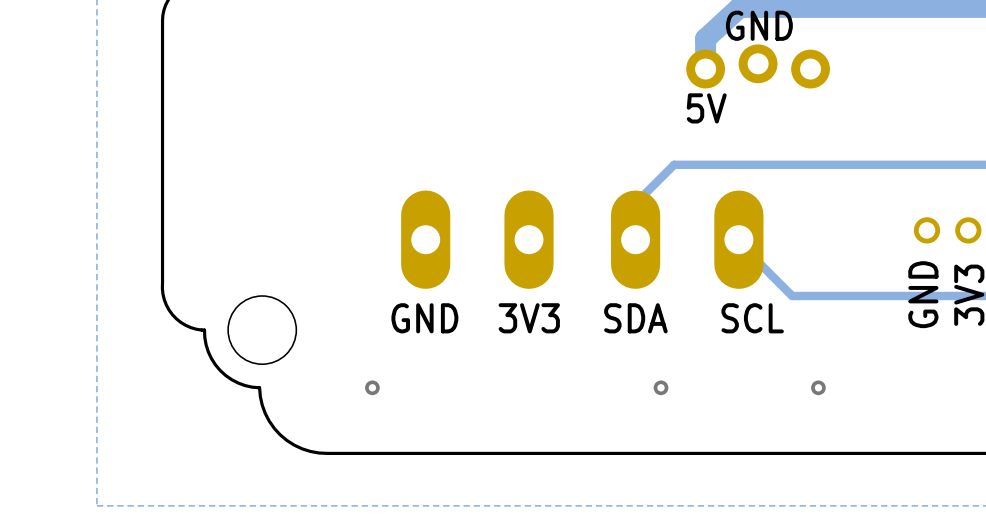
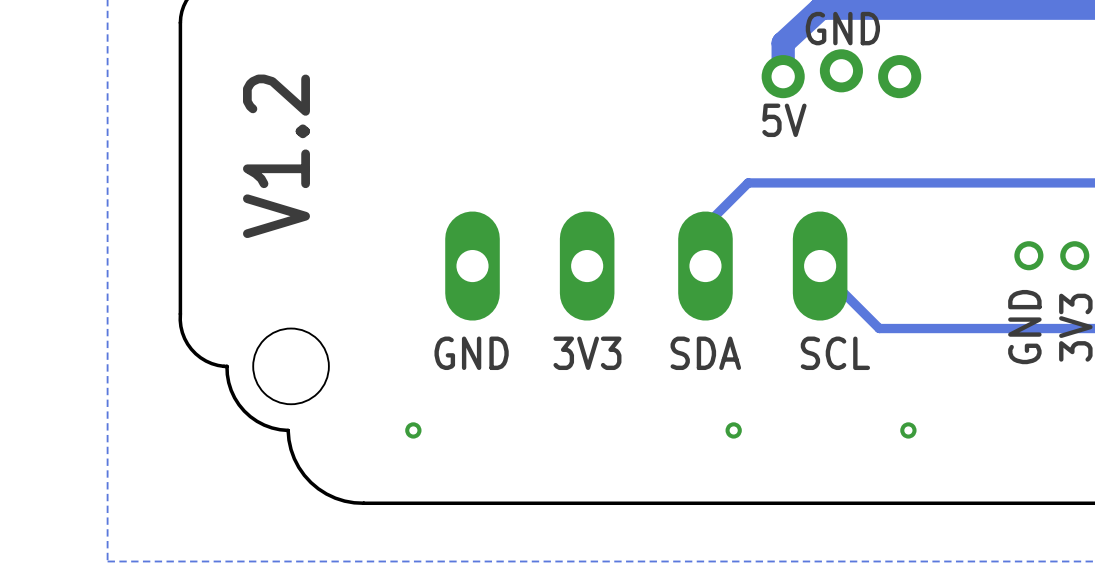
text: none -> V1.2 (276, 156)

